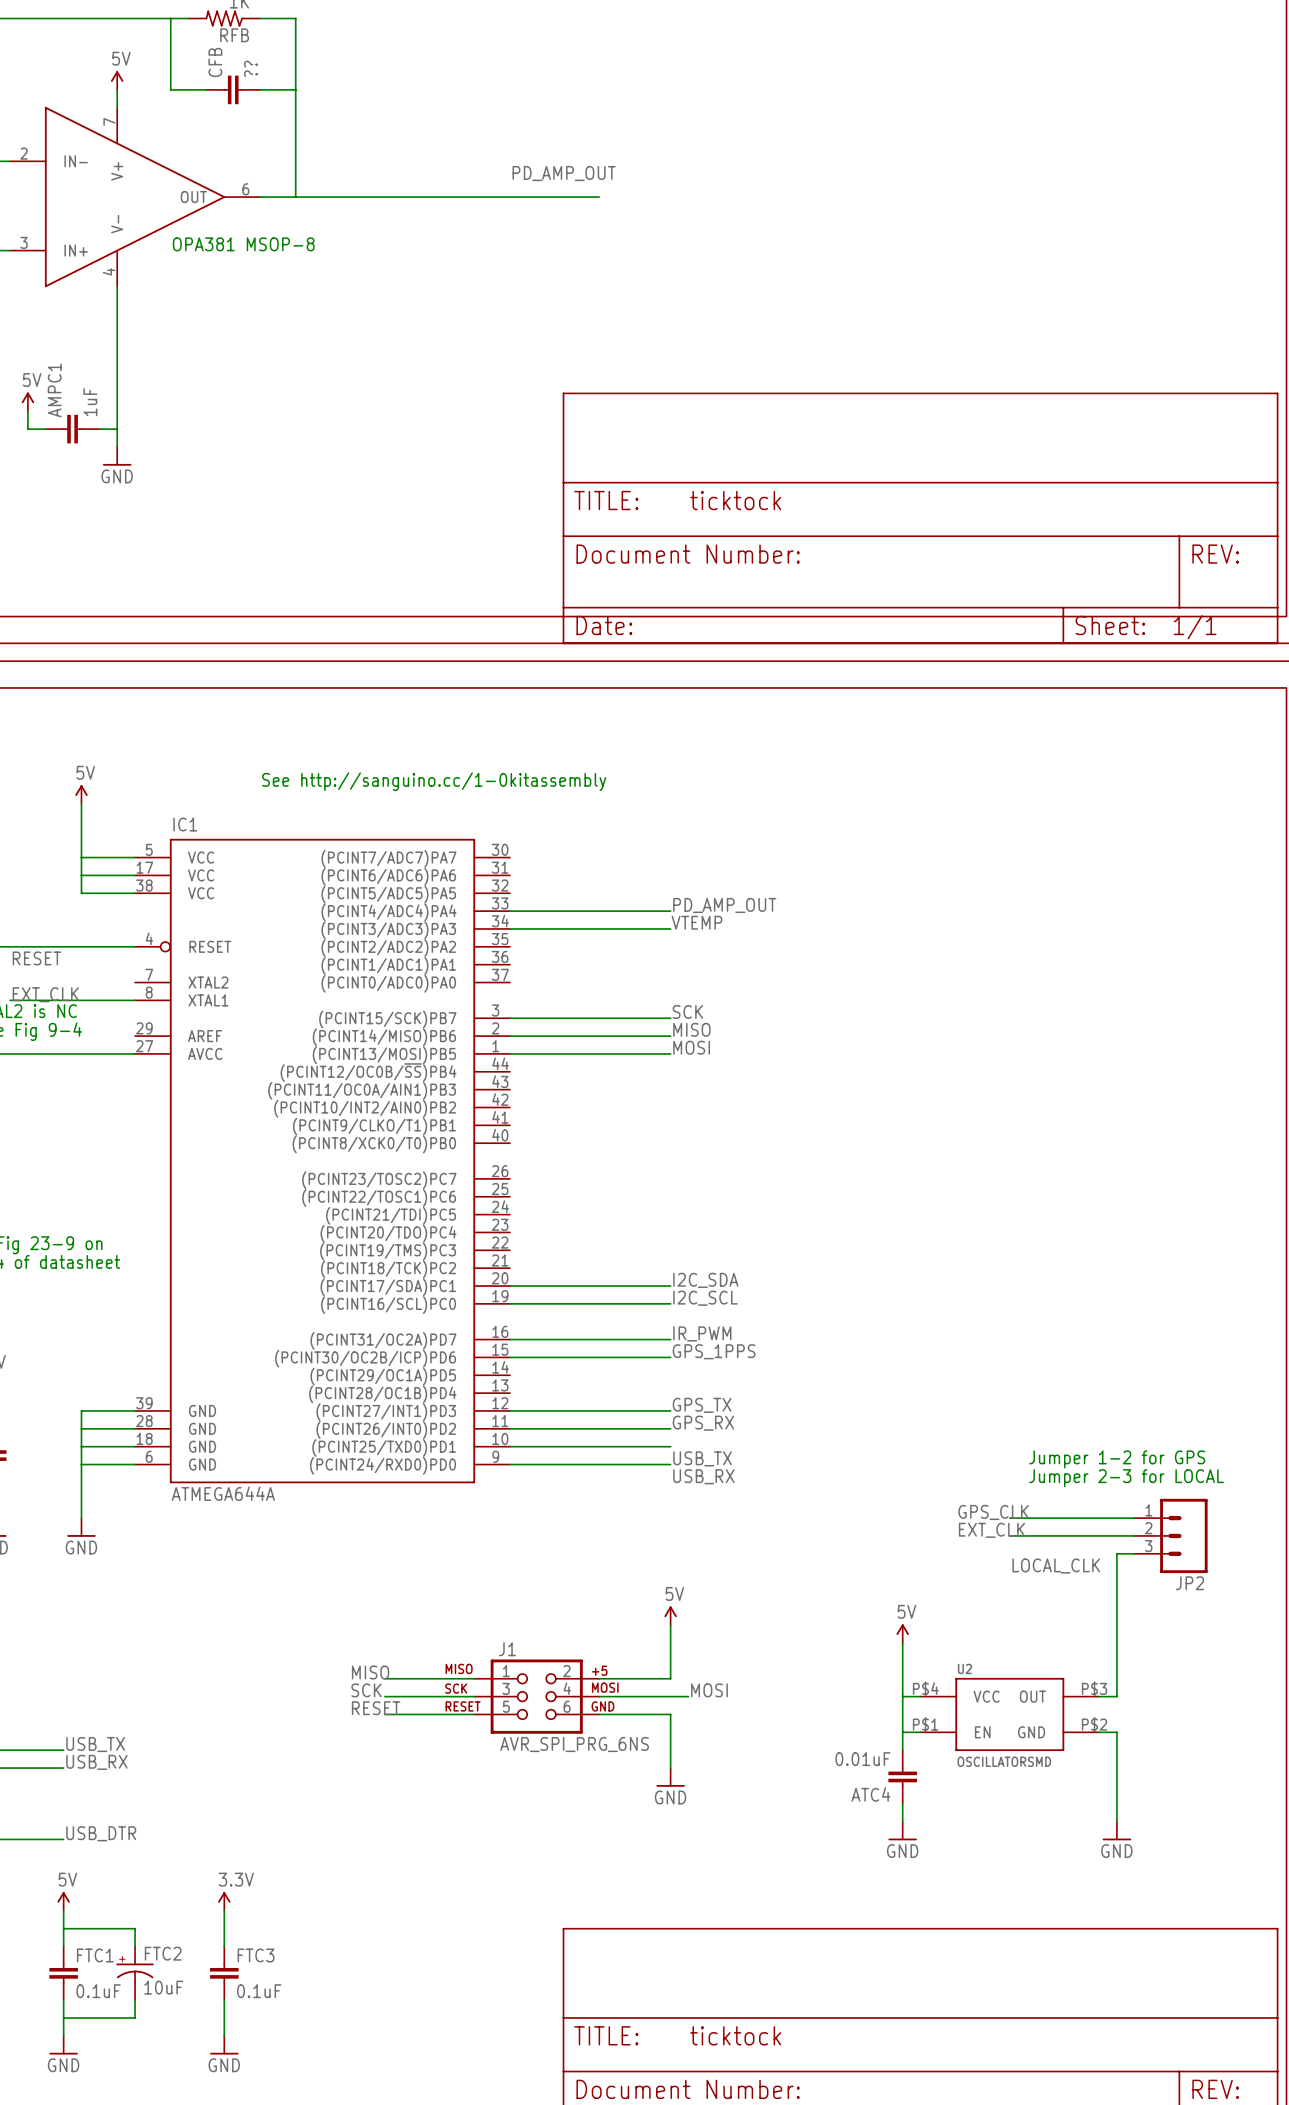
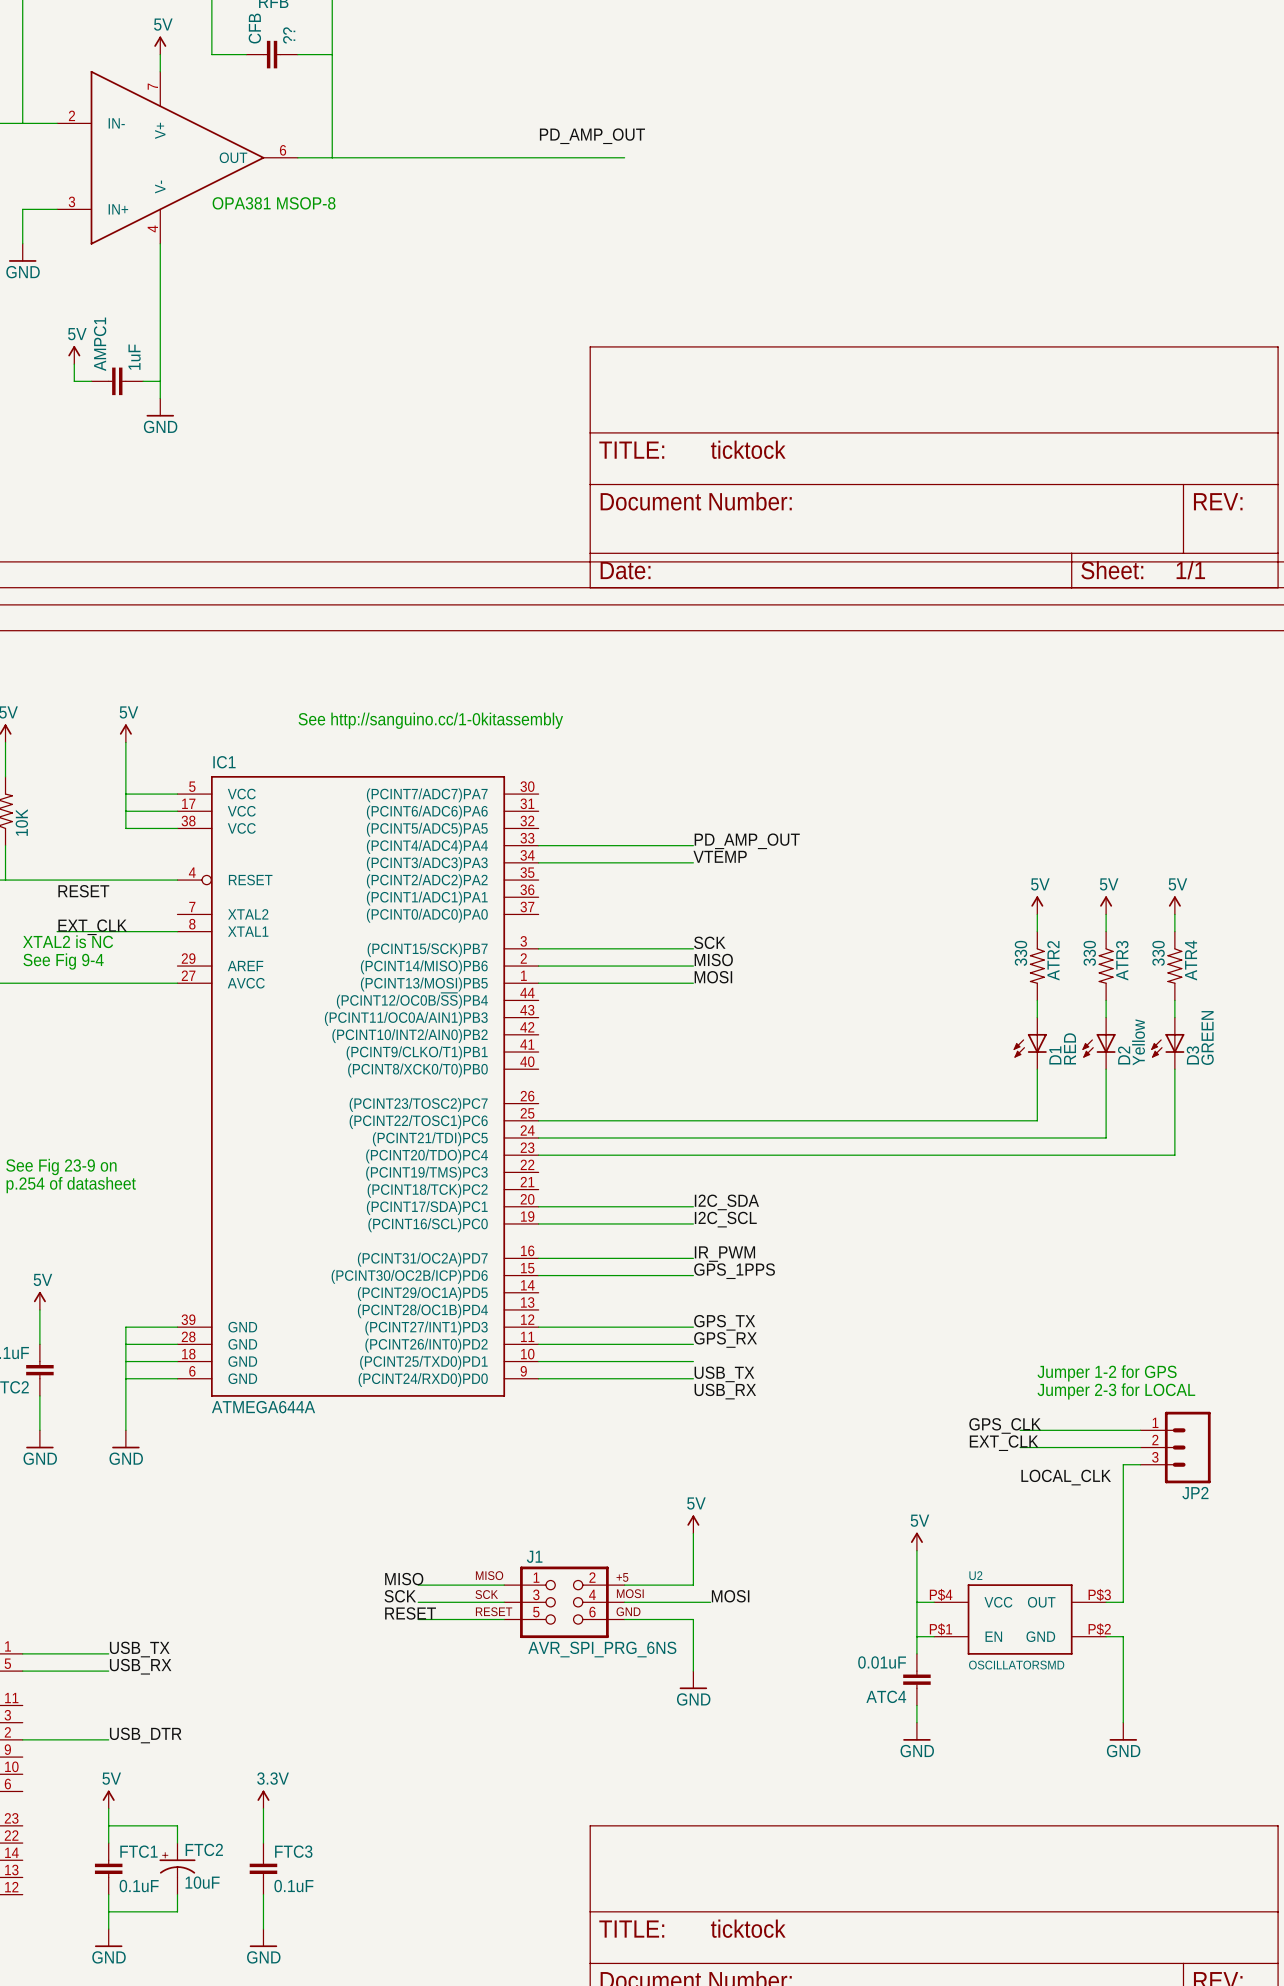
power symbol: none -> 5V (1037, 905)
power symbol: none -> 5V (1106, 905)
power symbol: none -> 5V (1174, 905)
wire: none -> (1037, 914) (1037, 931)
wire: none -> (1106, 914) (1106, 931)
wire: none -> (1174, 914) (1174, 931)
ATR2: none -> 330 (1037, 966)
ATR3: none -> 330 (1106, 966)
ATR4: none -> 330 (1174, 966)
wire: none -> (1037, 1000) (1037, 1017)
wire: none -> (1106, 1000) (1106, 1017)
wire: none -> (1174, 1000) (1174, 1017)
D1: none -> RED (1030, 1043)
D2: none -> Yellow (1098, 1043)
D3: none -> GREEN (1167, 1043)
wire: none -> (1037, 1069) (1037, 1120) (538, 1120)
wire: none -> (1106, 1069) (1106, 1137) (538, 1137)
wire: none -> (1174, 1069) (1174, 1155) (538, 1155)

